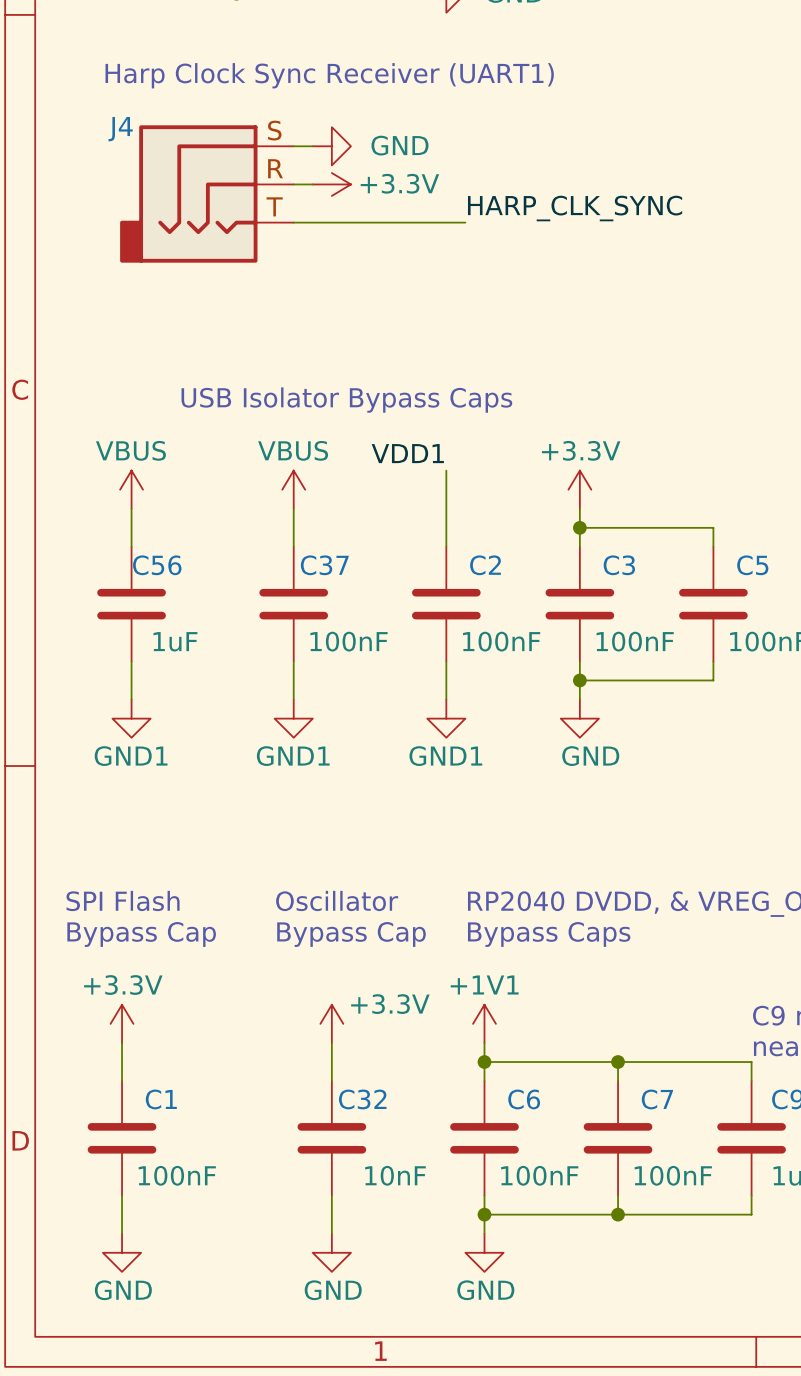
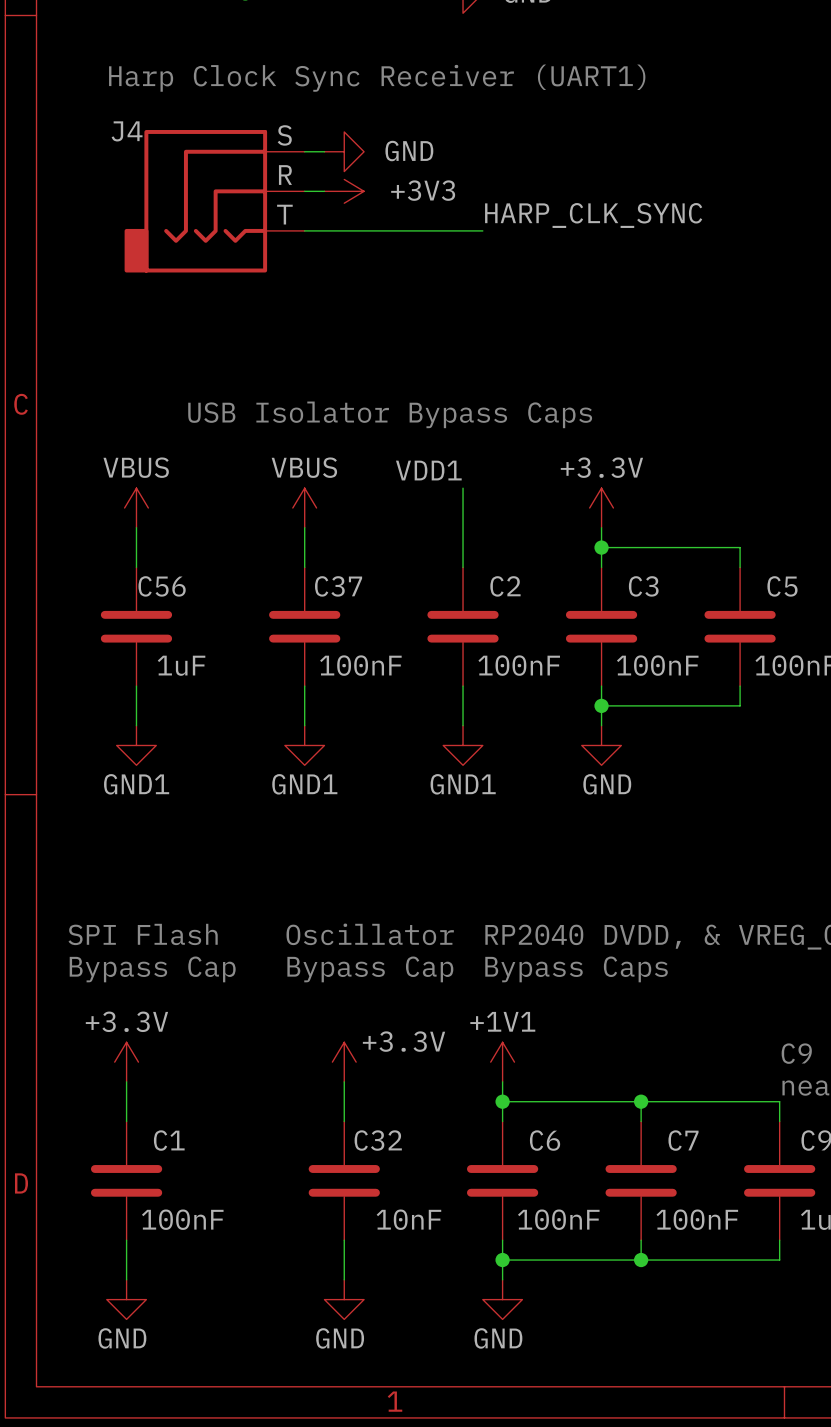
power symbol: +3.3V (331, 184) -> +3V3 (344, 191)

